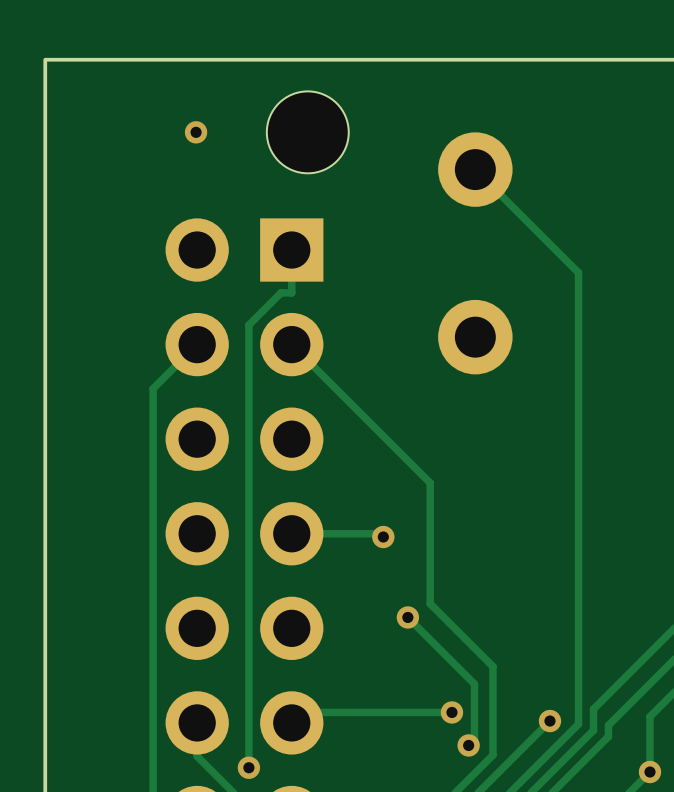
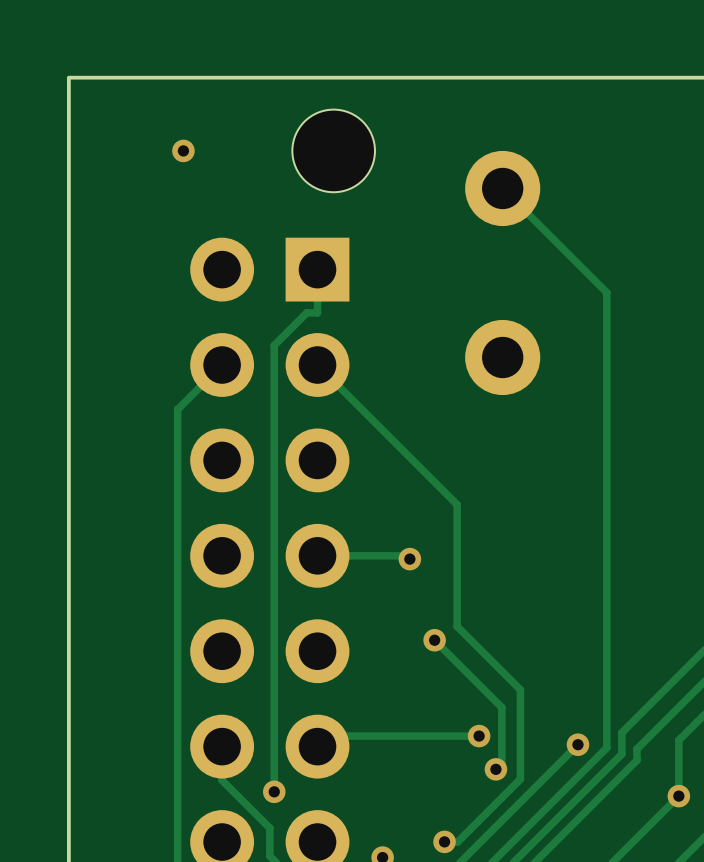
via position: (196, 132) -> (183, 150)

